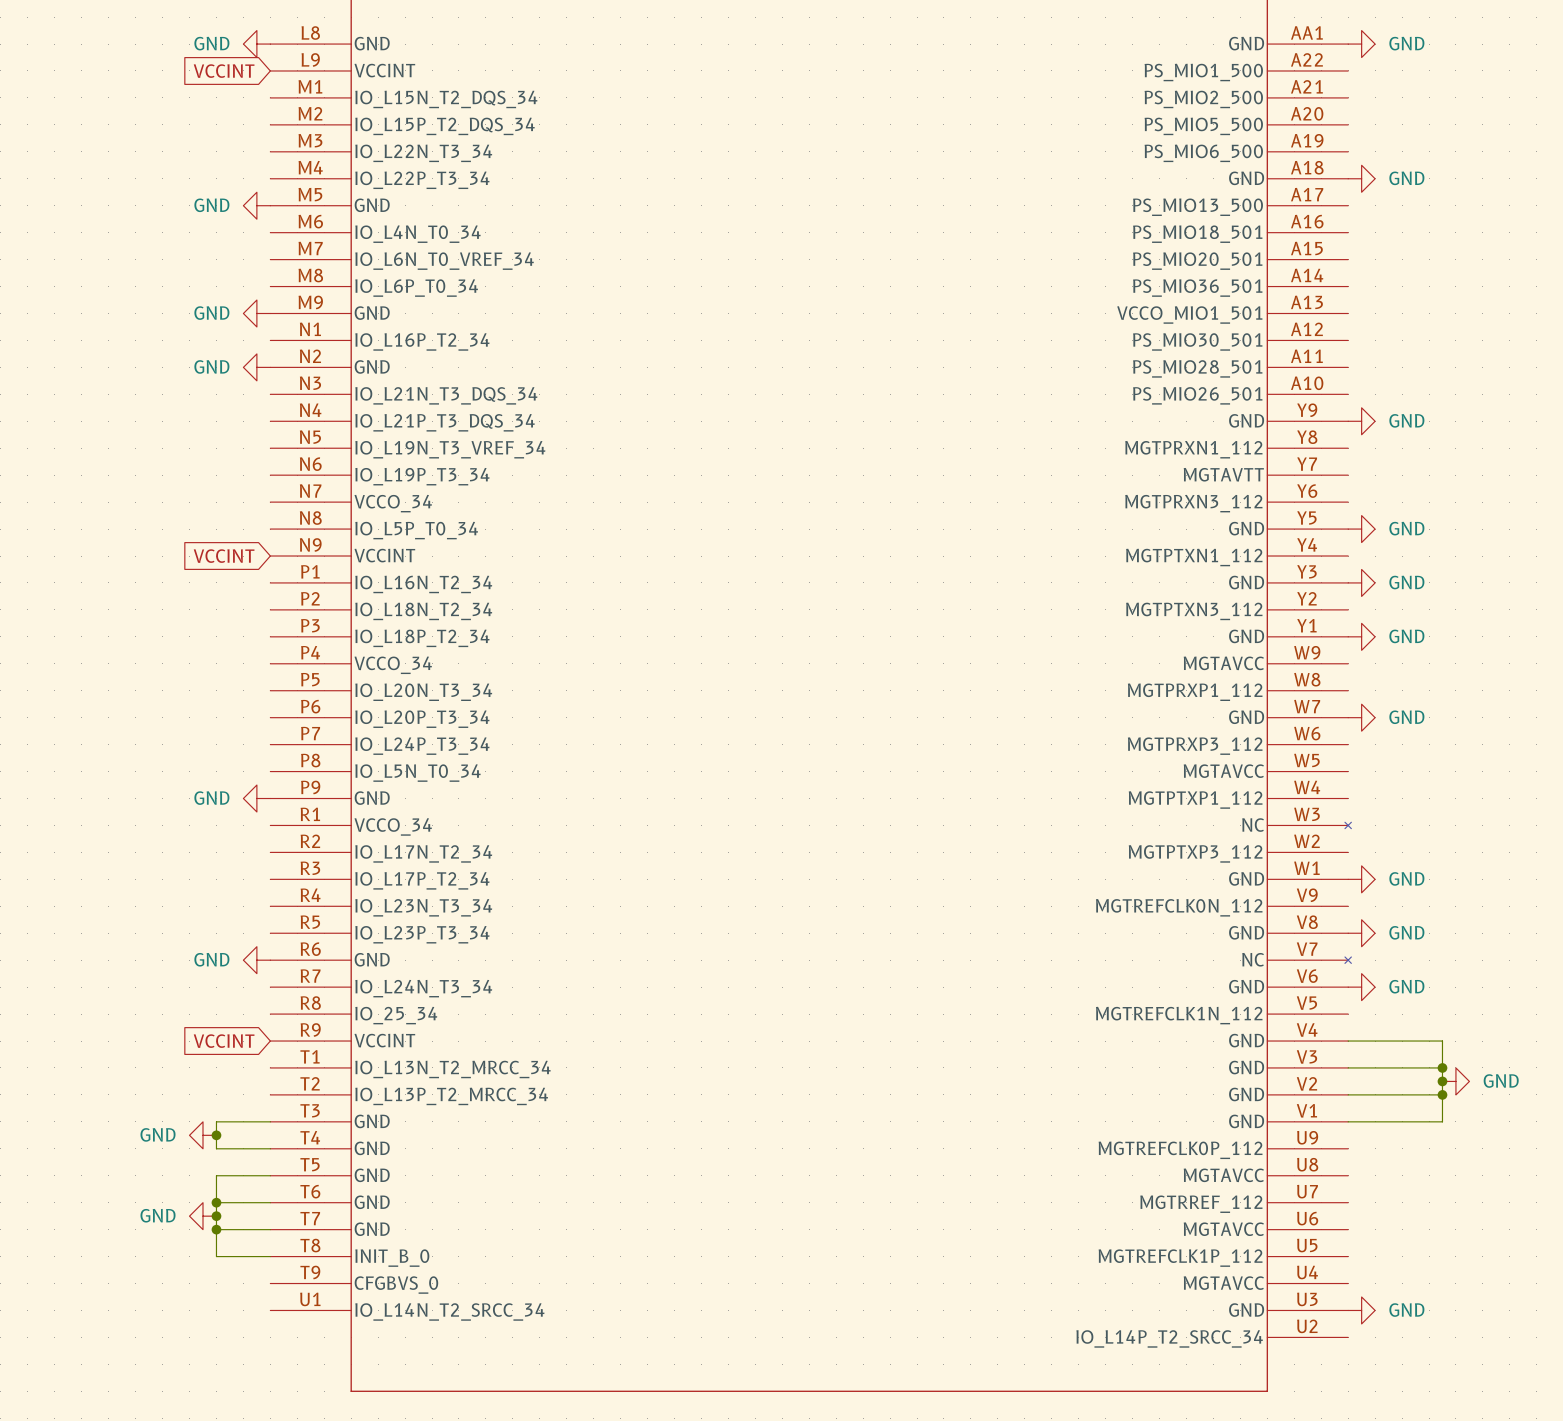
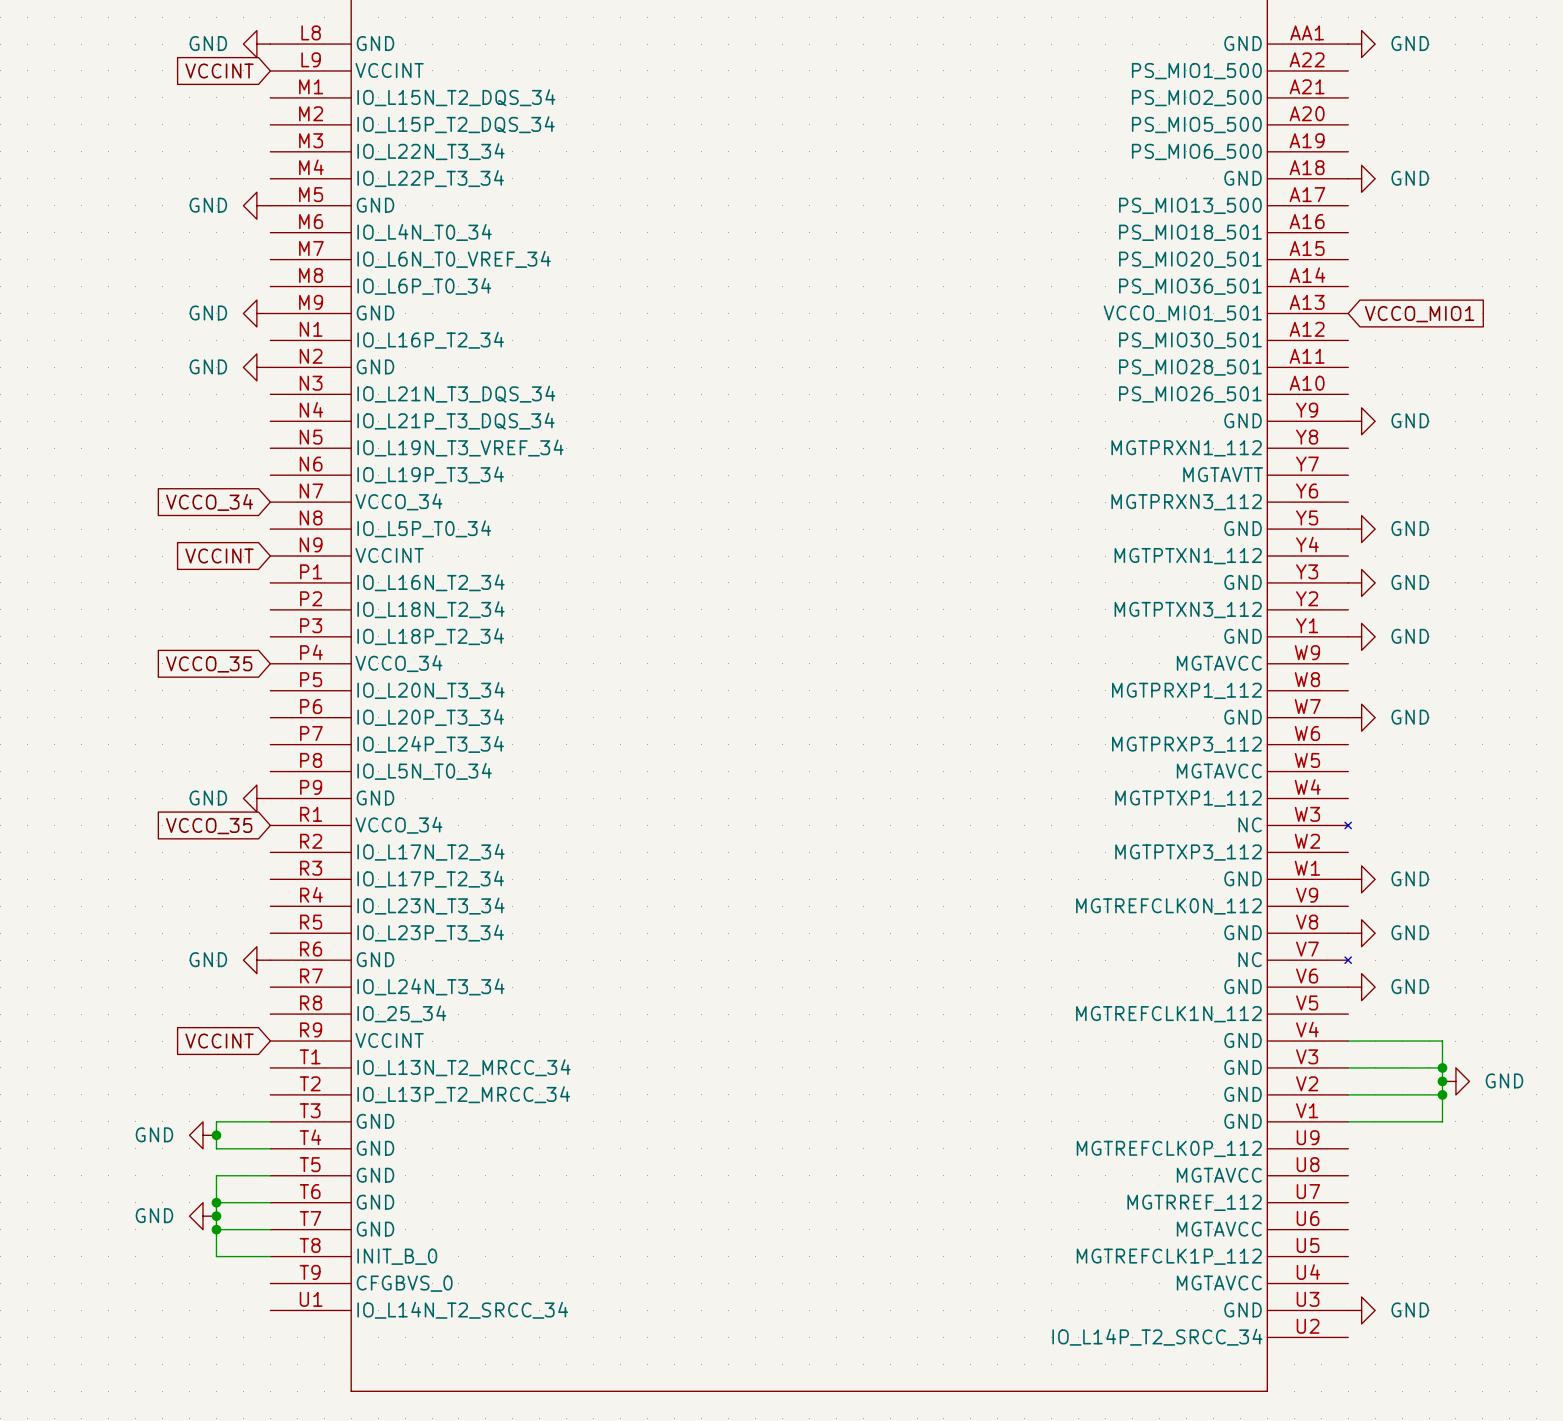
global label: none -> VCCO_MIO1 (1419, 314)
global label: none -> VCCO_34 (209, 502)
global label: none -> VCCO_35 (209, 664)
global label: none -> VCCO_35 (209, 826)

